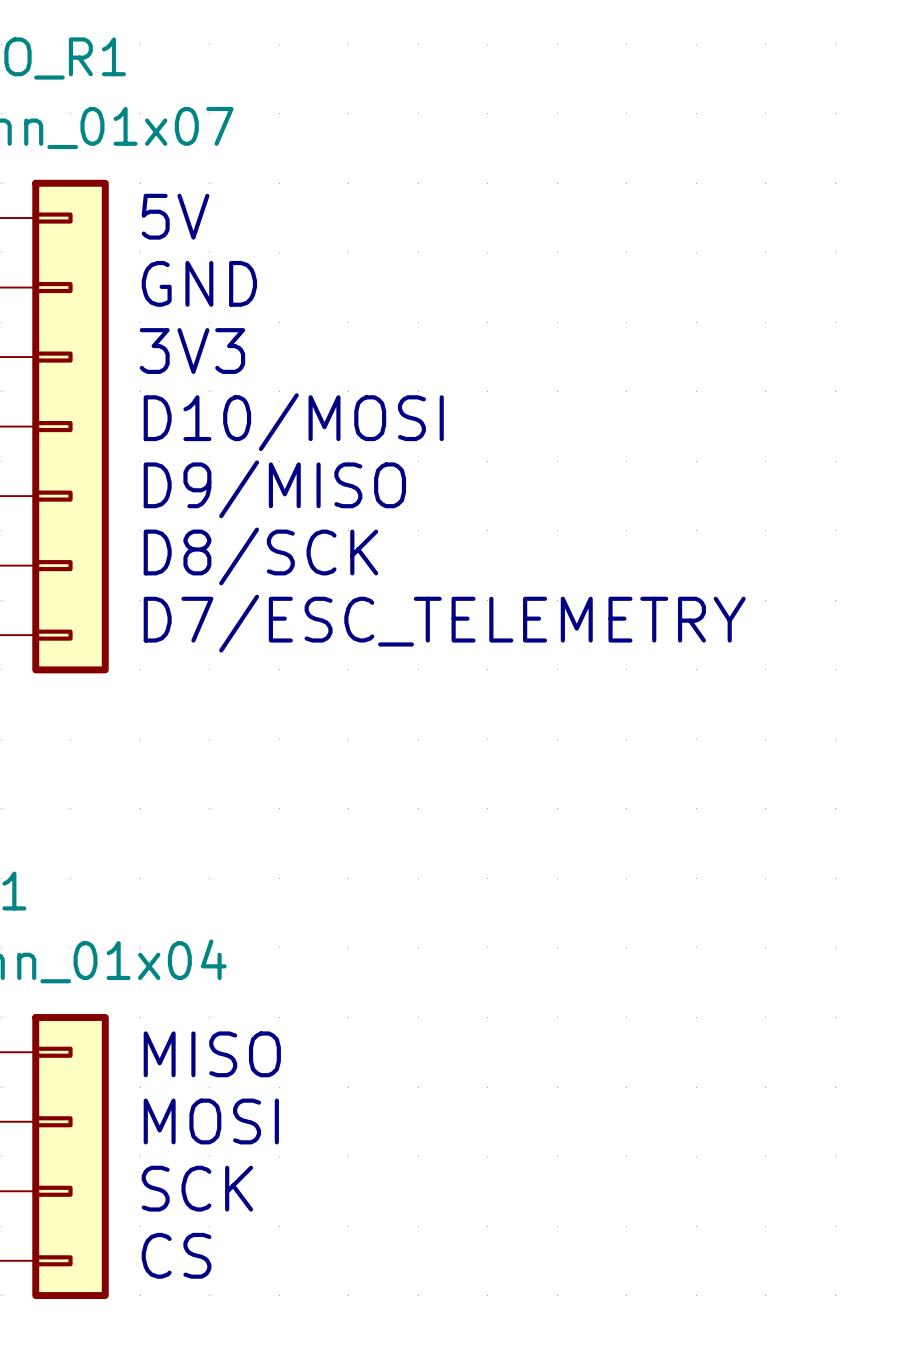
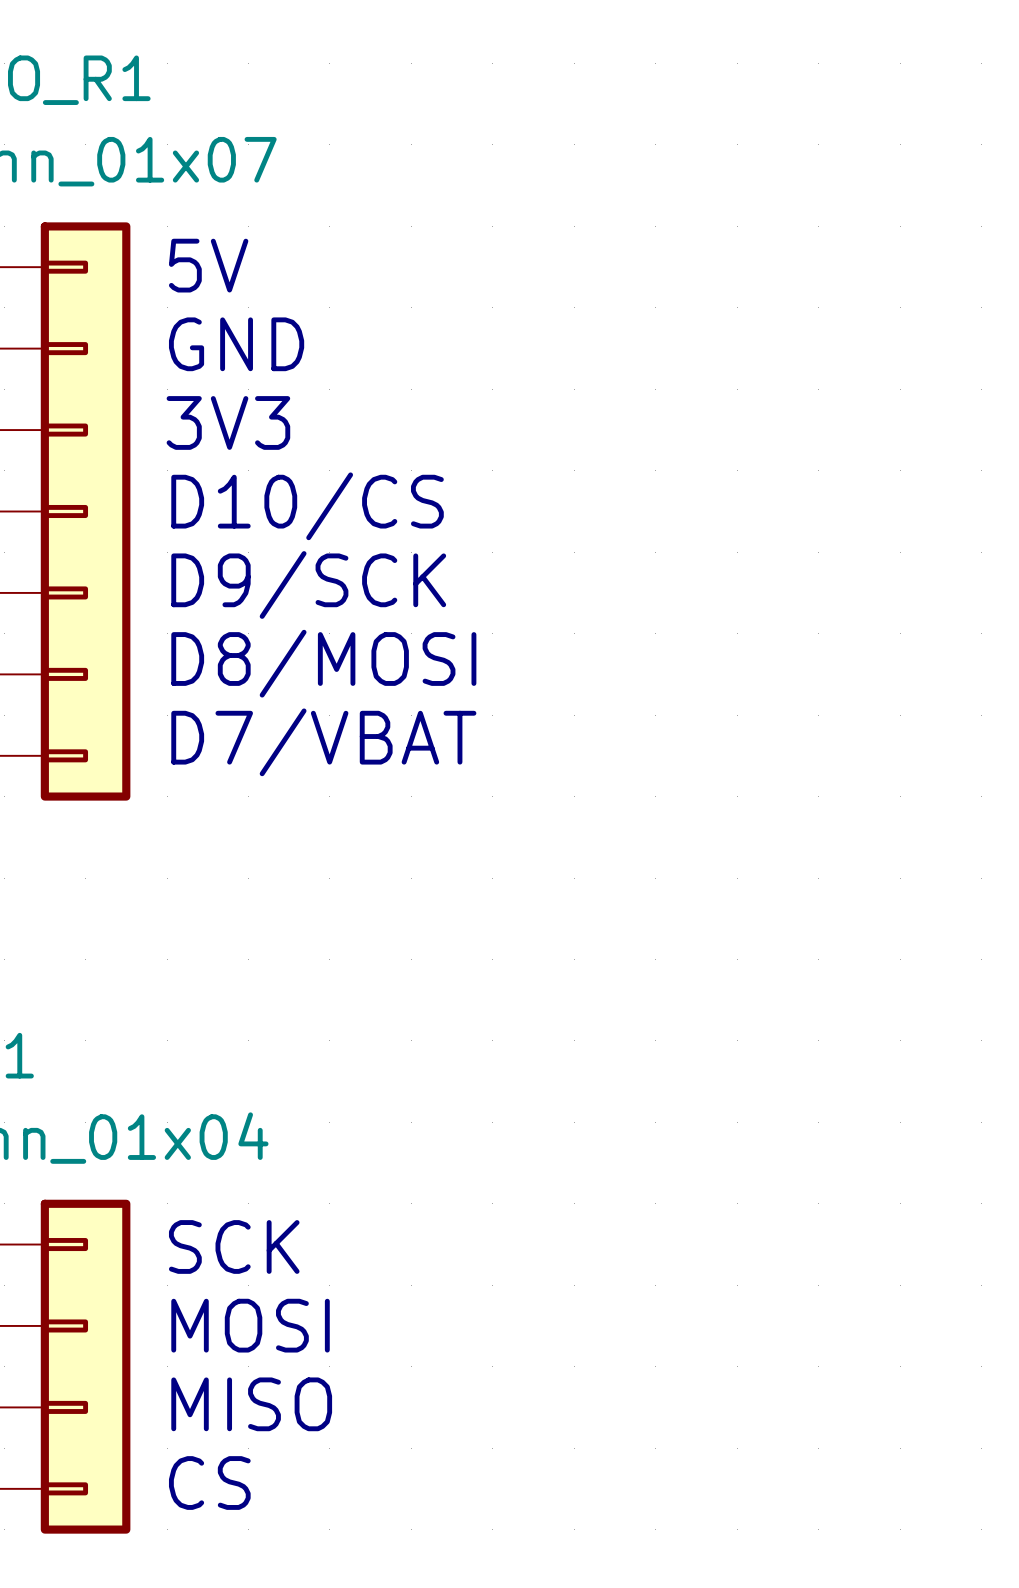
text: D10/MOSI (293, 422) -> D10/CS (307, 506)
text: D9/MISO (274, 489) -> D9/SCK (308, 584)
text: D8/SCK (260, 556) -> D8/MOSI (323, 663)
text: D7/ESC_TELEMETRY (444, 623) -> D7/VBAT (323, 742)
text: MISO (212, 1054) -> SCK (234, 1246)
text: SCK (197, 1188) -> MISO (251, 1404)

